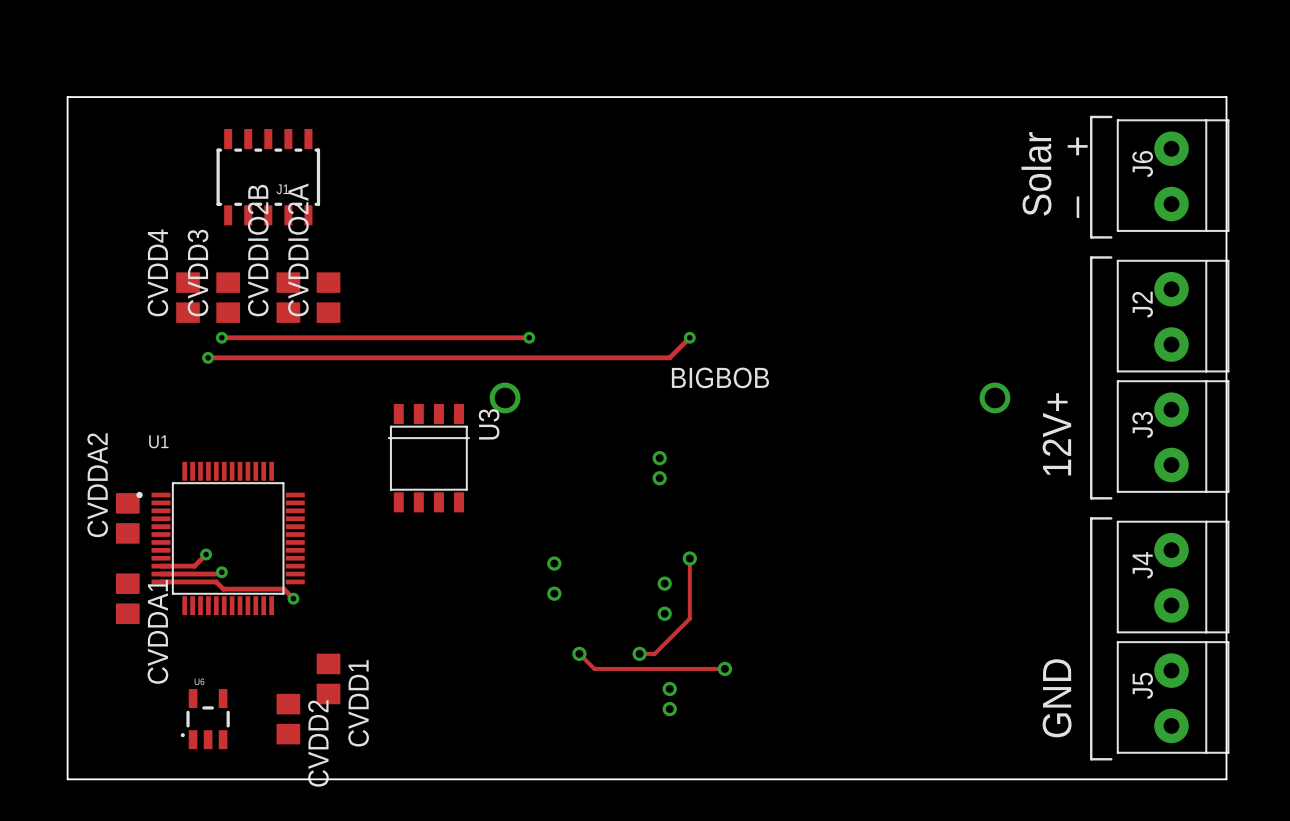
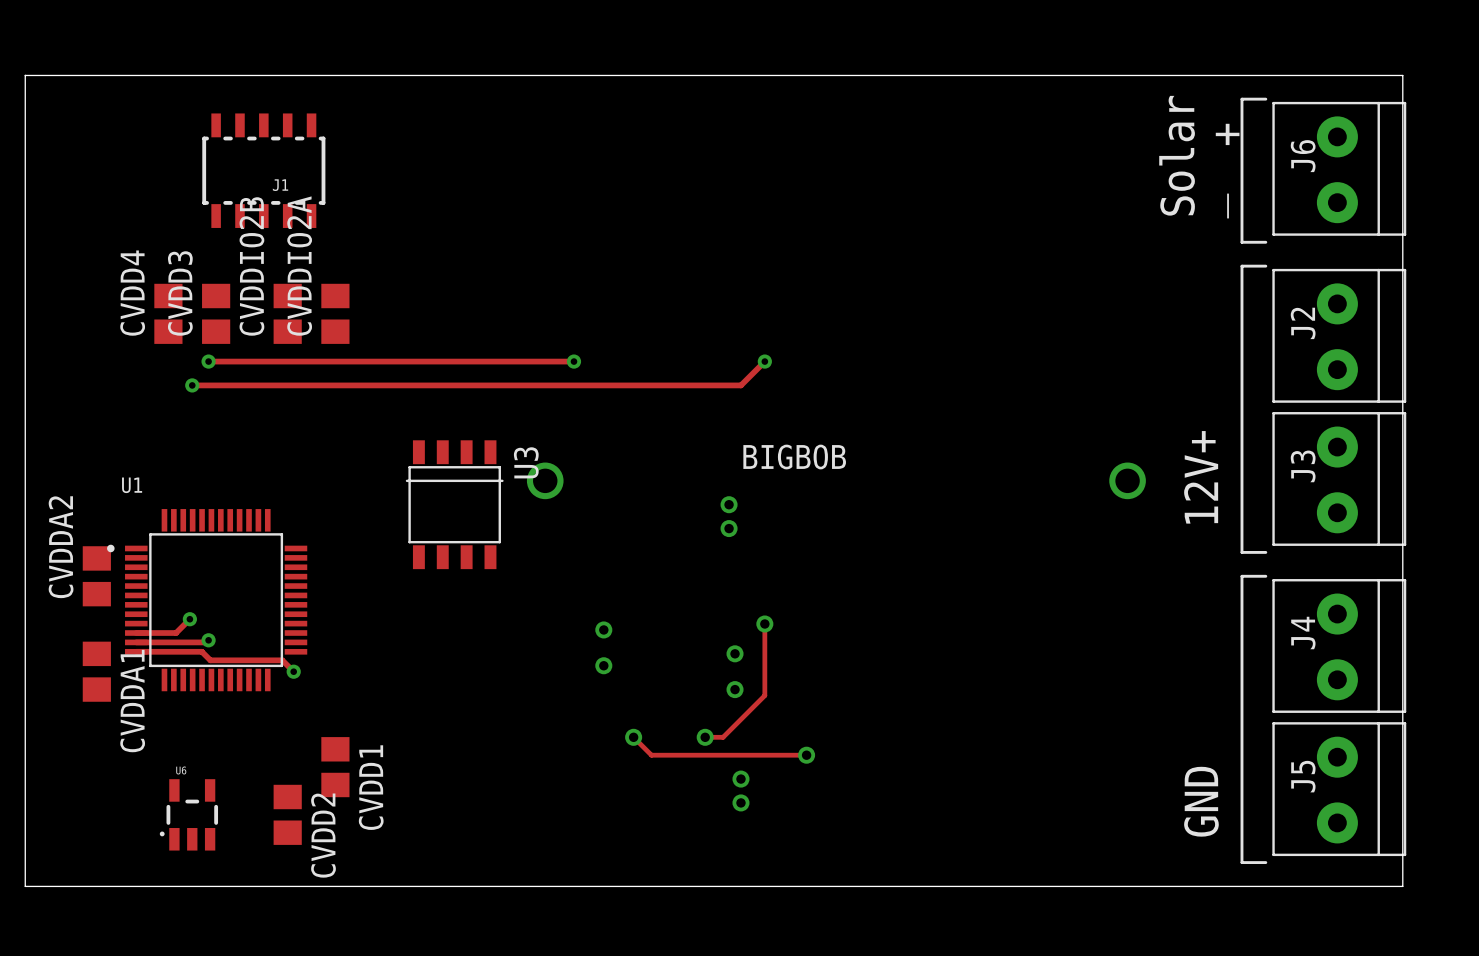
BIGBOB position: (750, 397) -> (836, 480)

